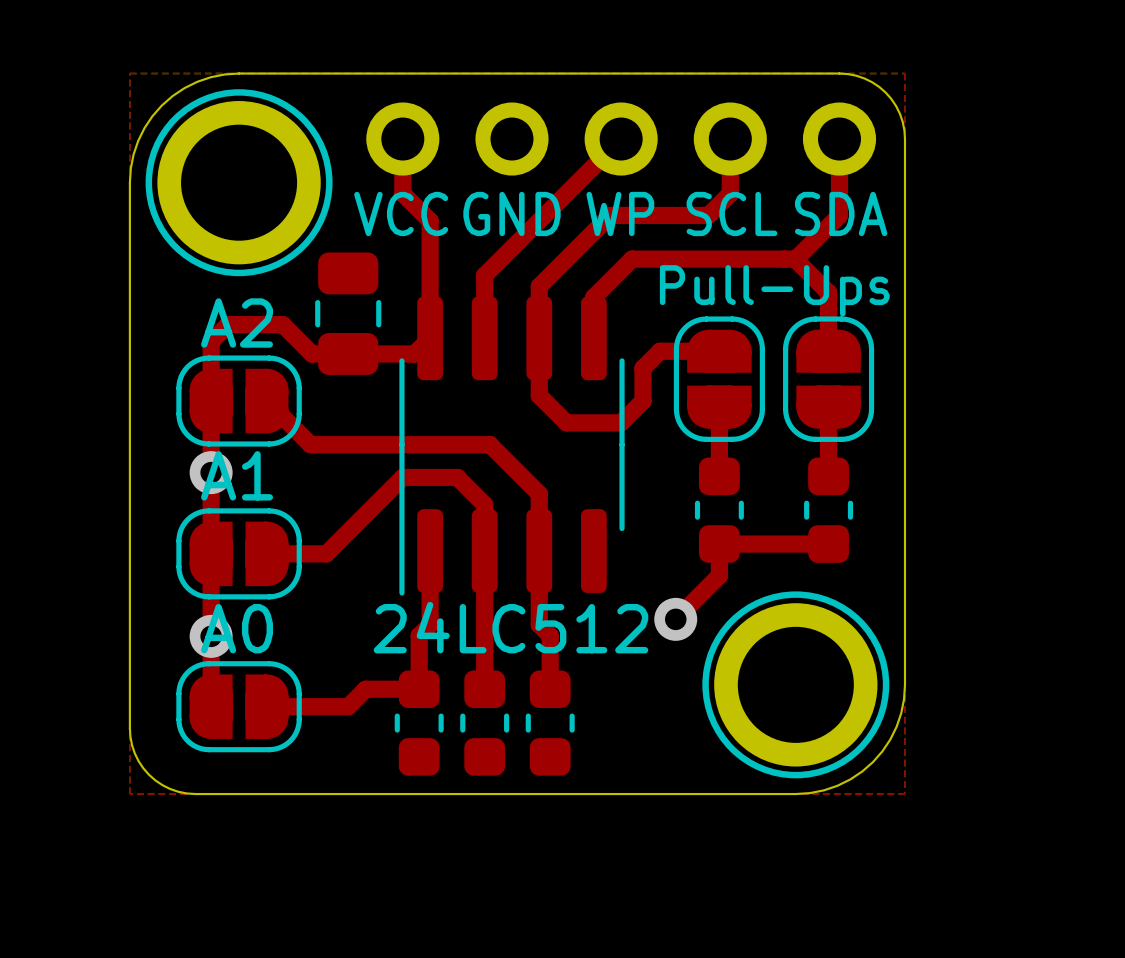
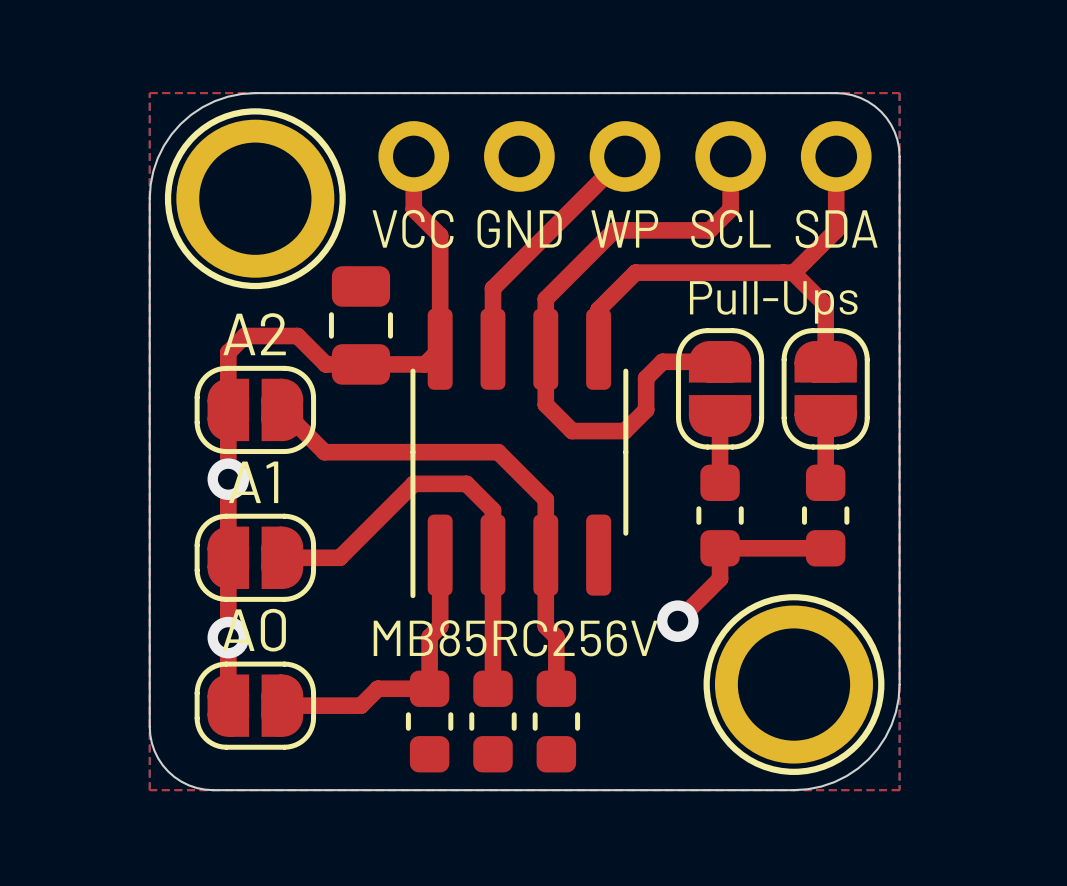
24LC512 name: 24LC512 (510, 627) -> MB85RC256V (515, 638)

